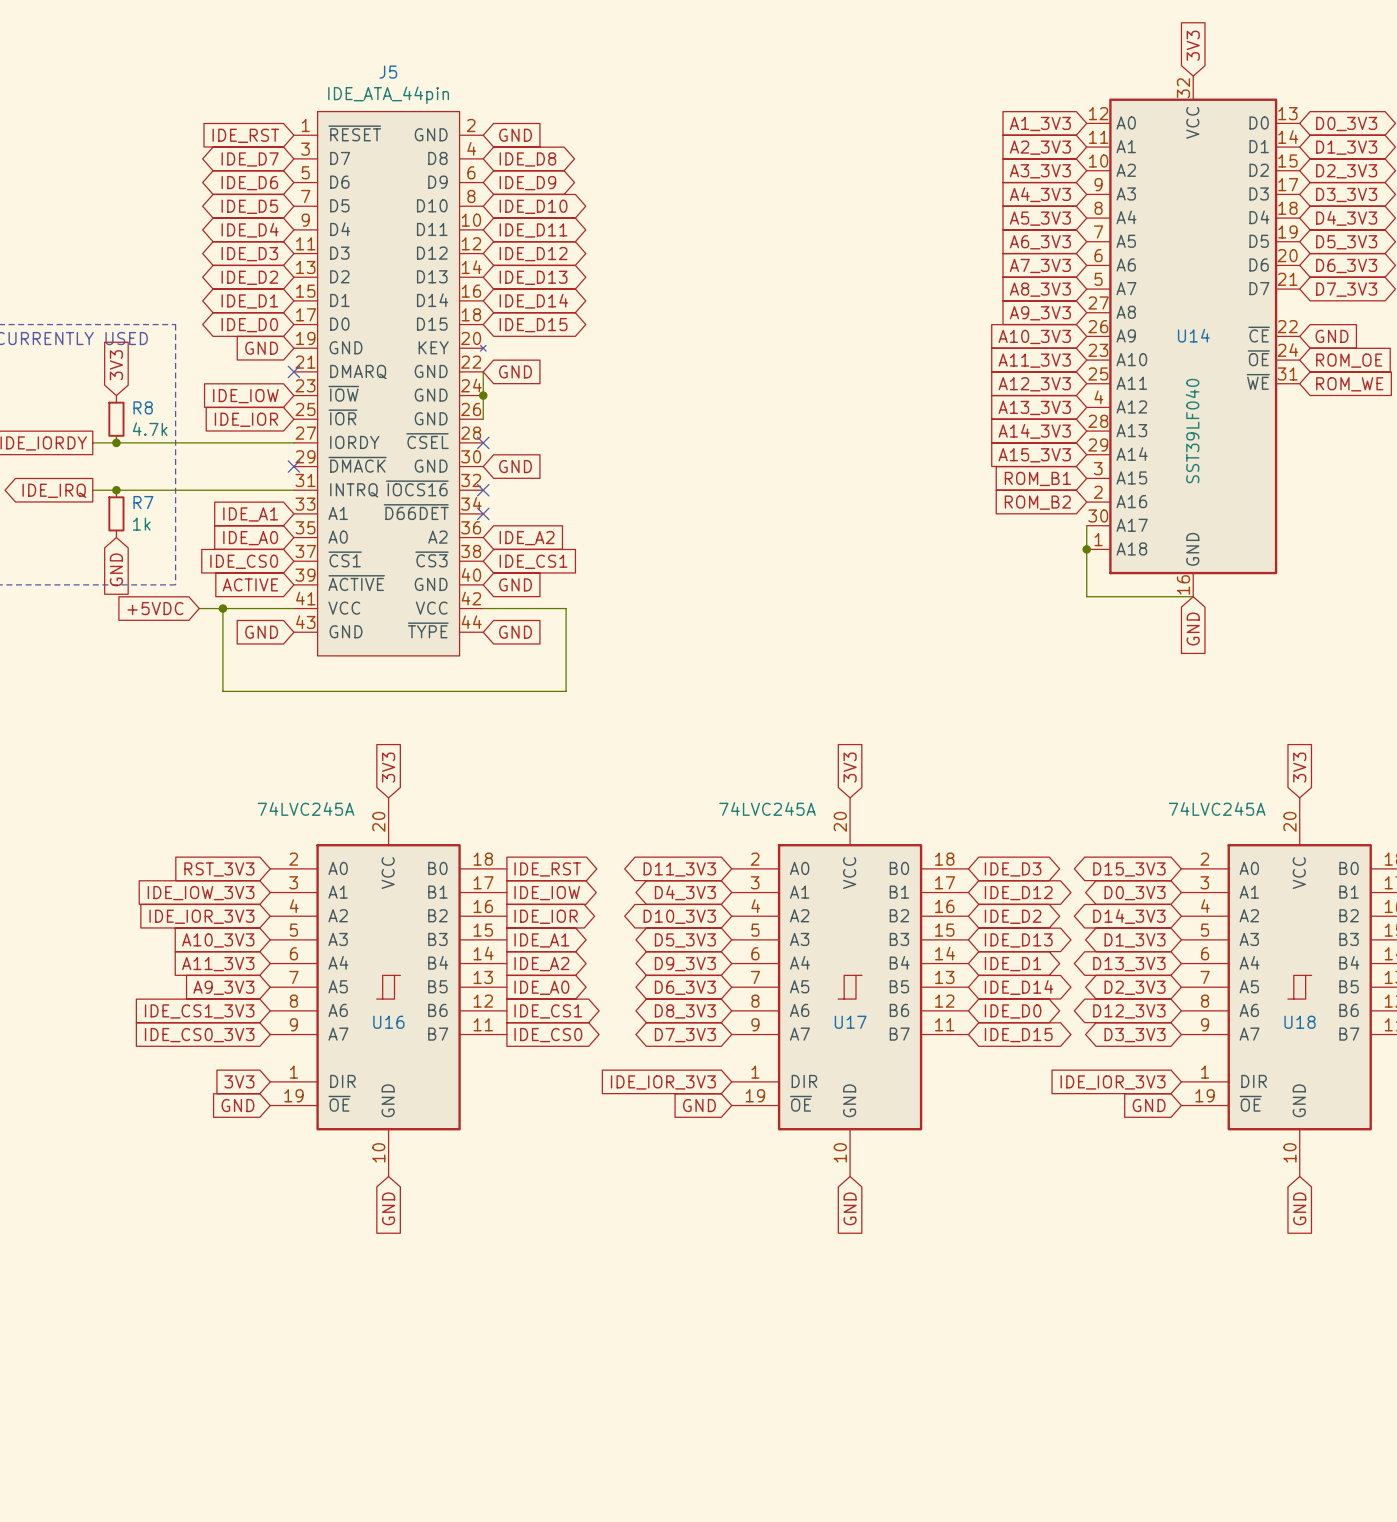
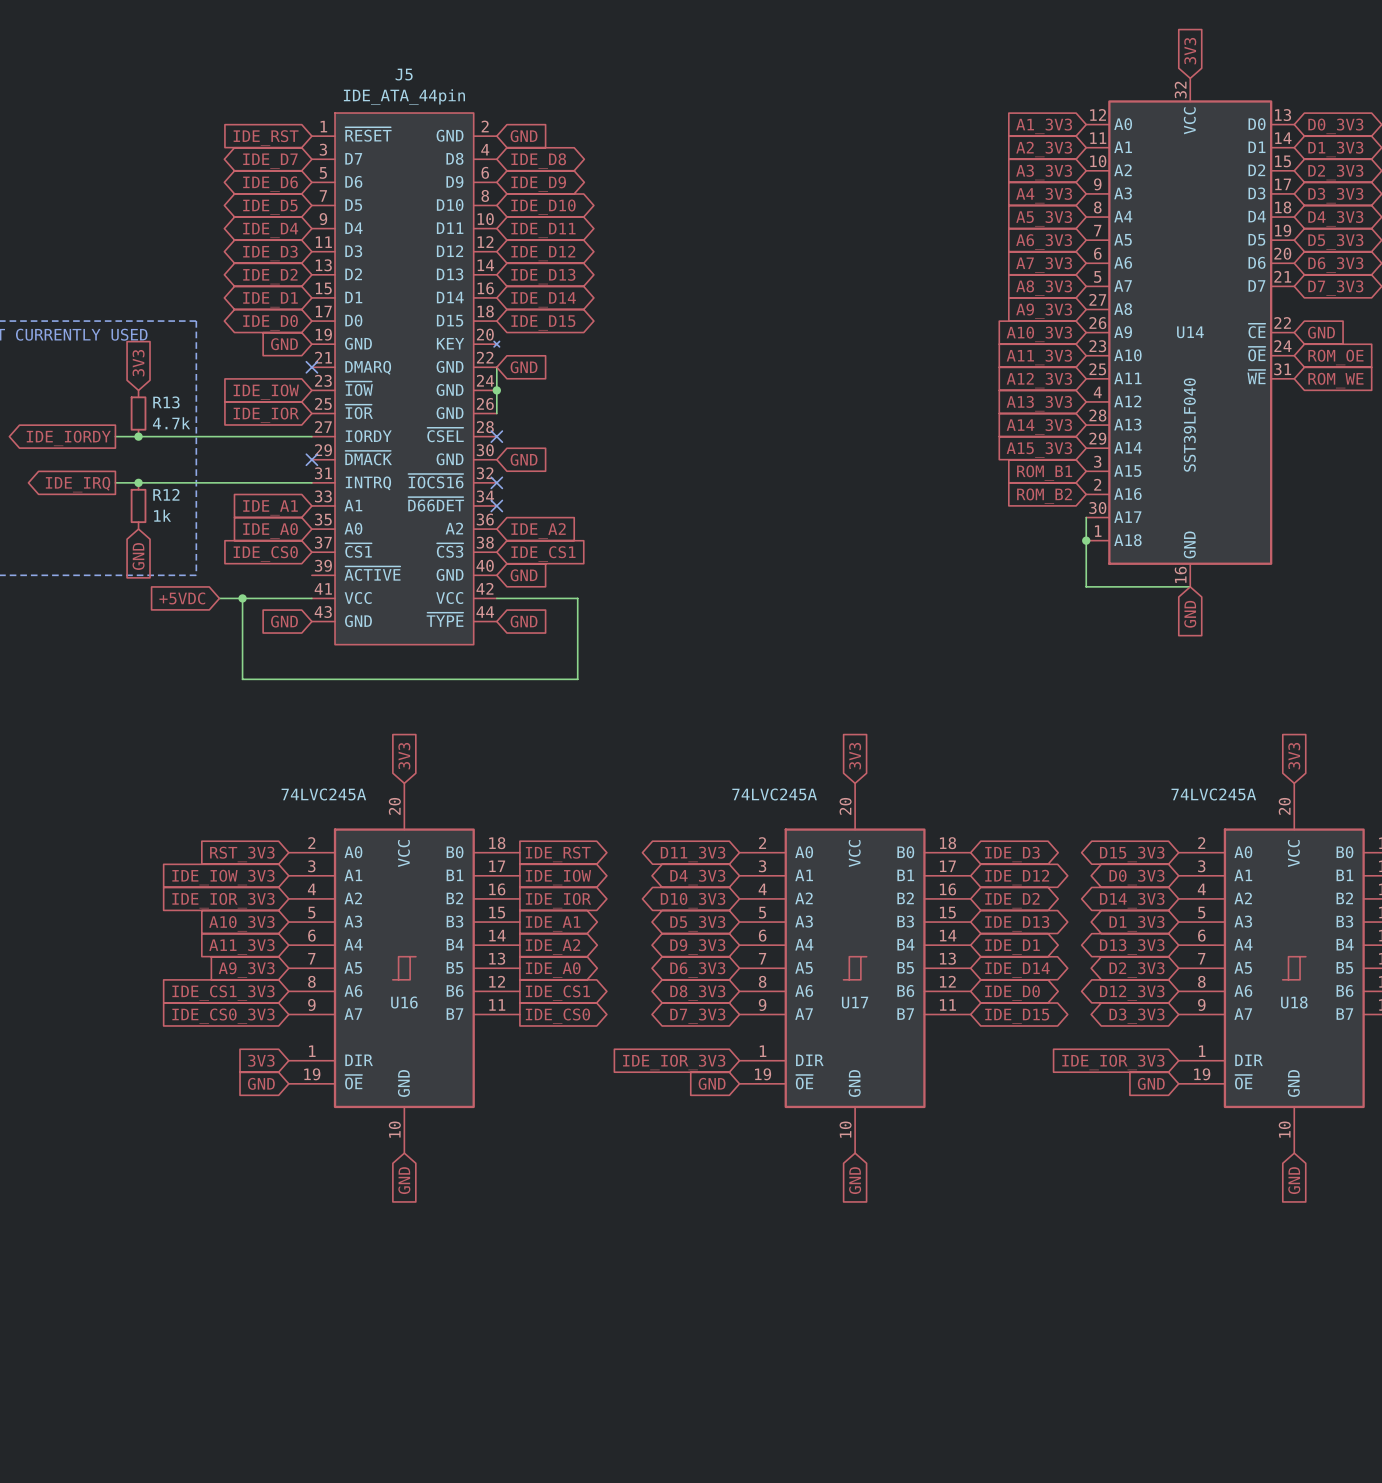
R8 name: R8 (143, 407) -> R13 (166, 402)
R7 name: R7 (143, 502) -> R12 (166, 494)
global label: ACTIVE (250, 584) -> none

